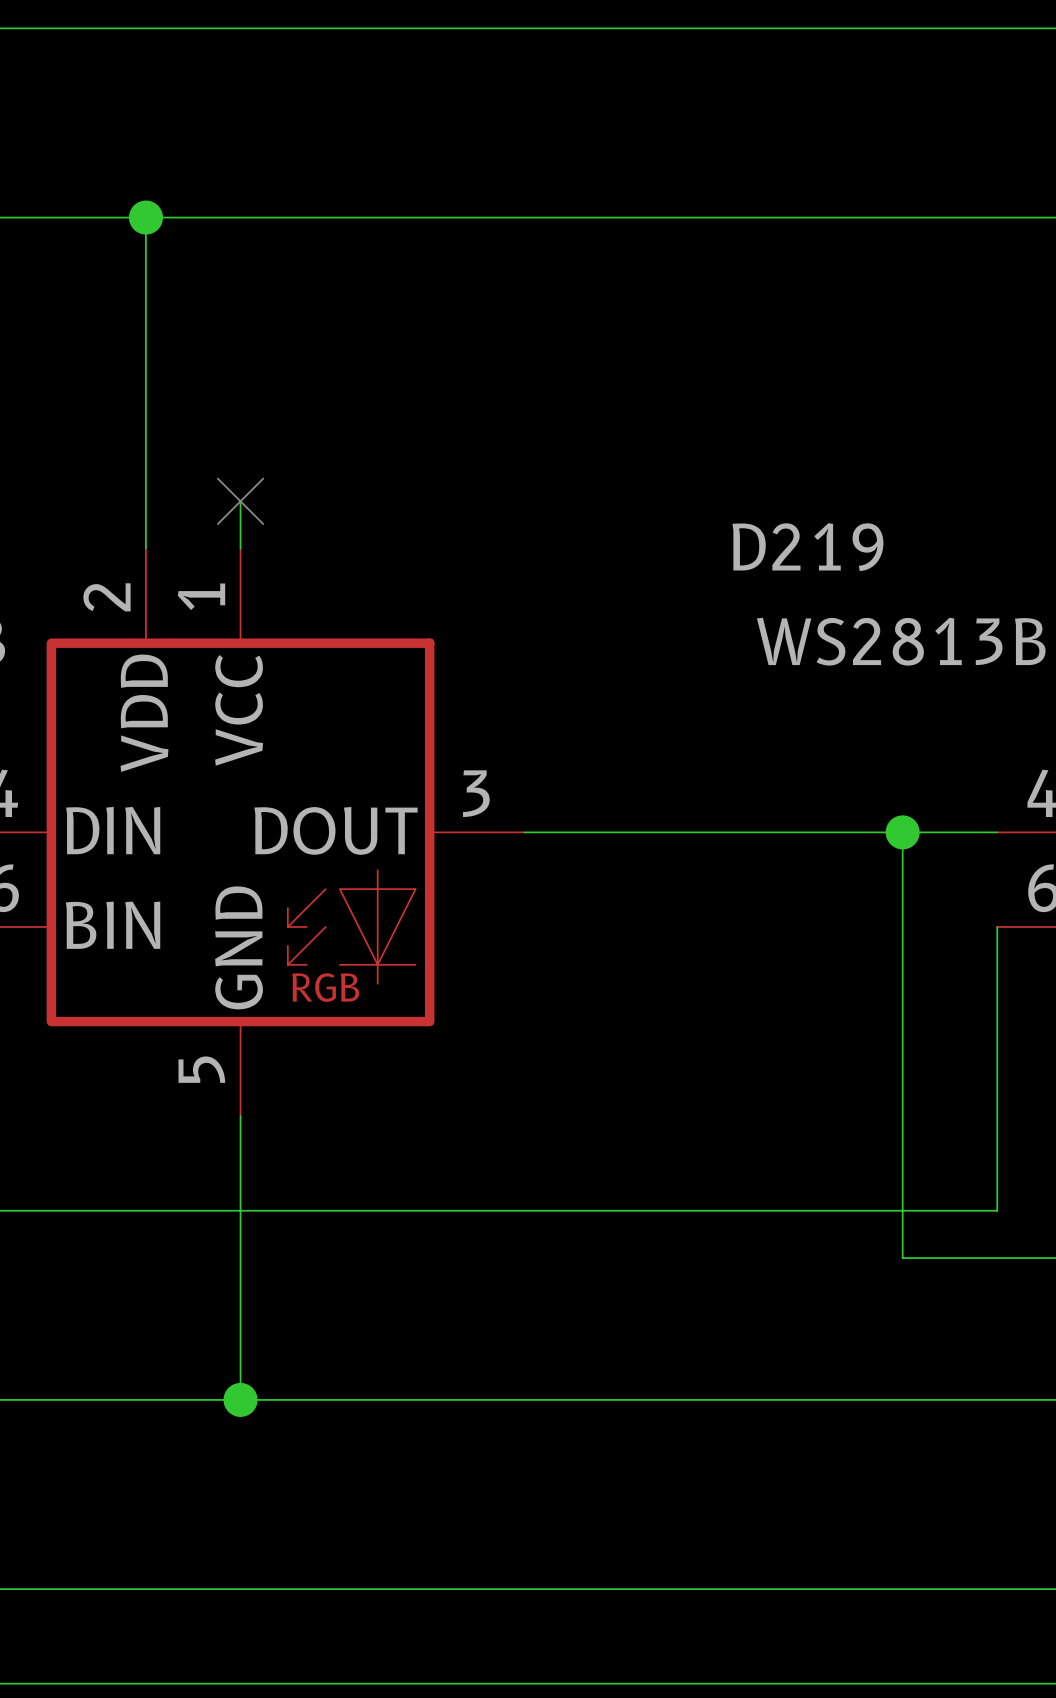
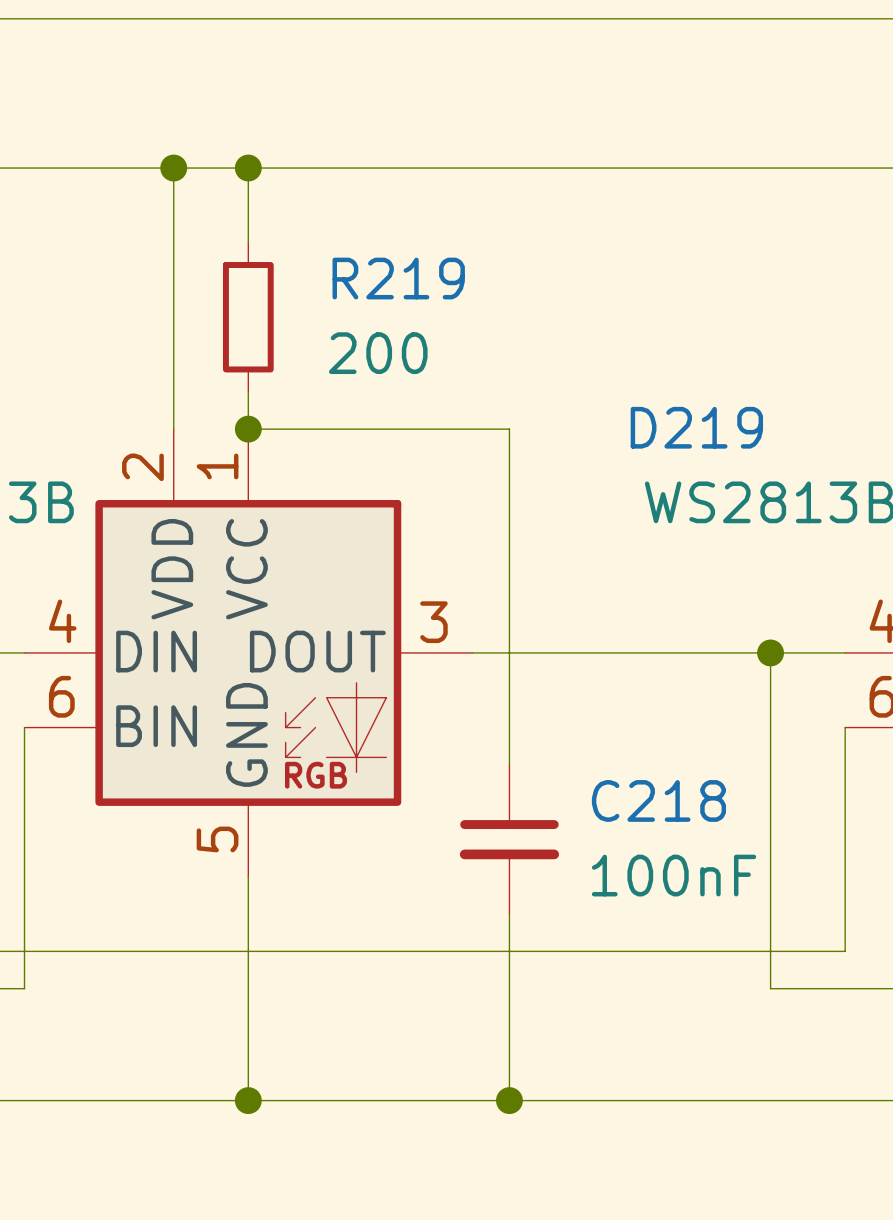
wire: none -> (248, 168) (248, 242)
junction: none -> (248, 168)
R219: none -> 200 (248, 317)
no-connect mark: (240, 501) -> none
wire: none -> (248, 429) (509, 429) (509, 764)
junction: none -> (248, 429)
C218: none -> 100nF (509, 839)
wire: none -> (509, 914) (509, 1100)
junction: none -> (509, 1100)

